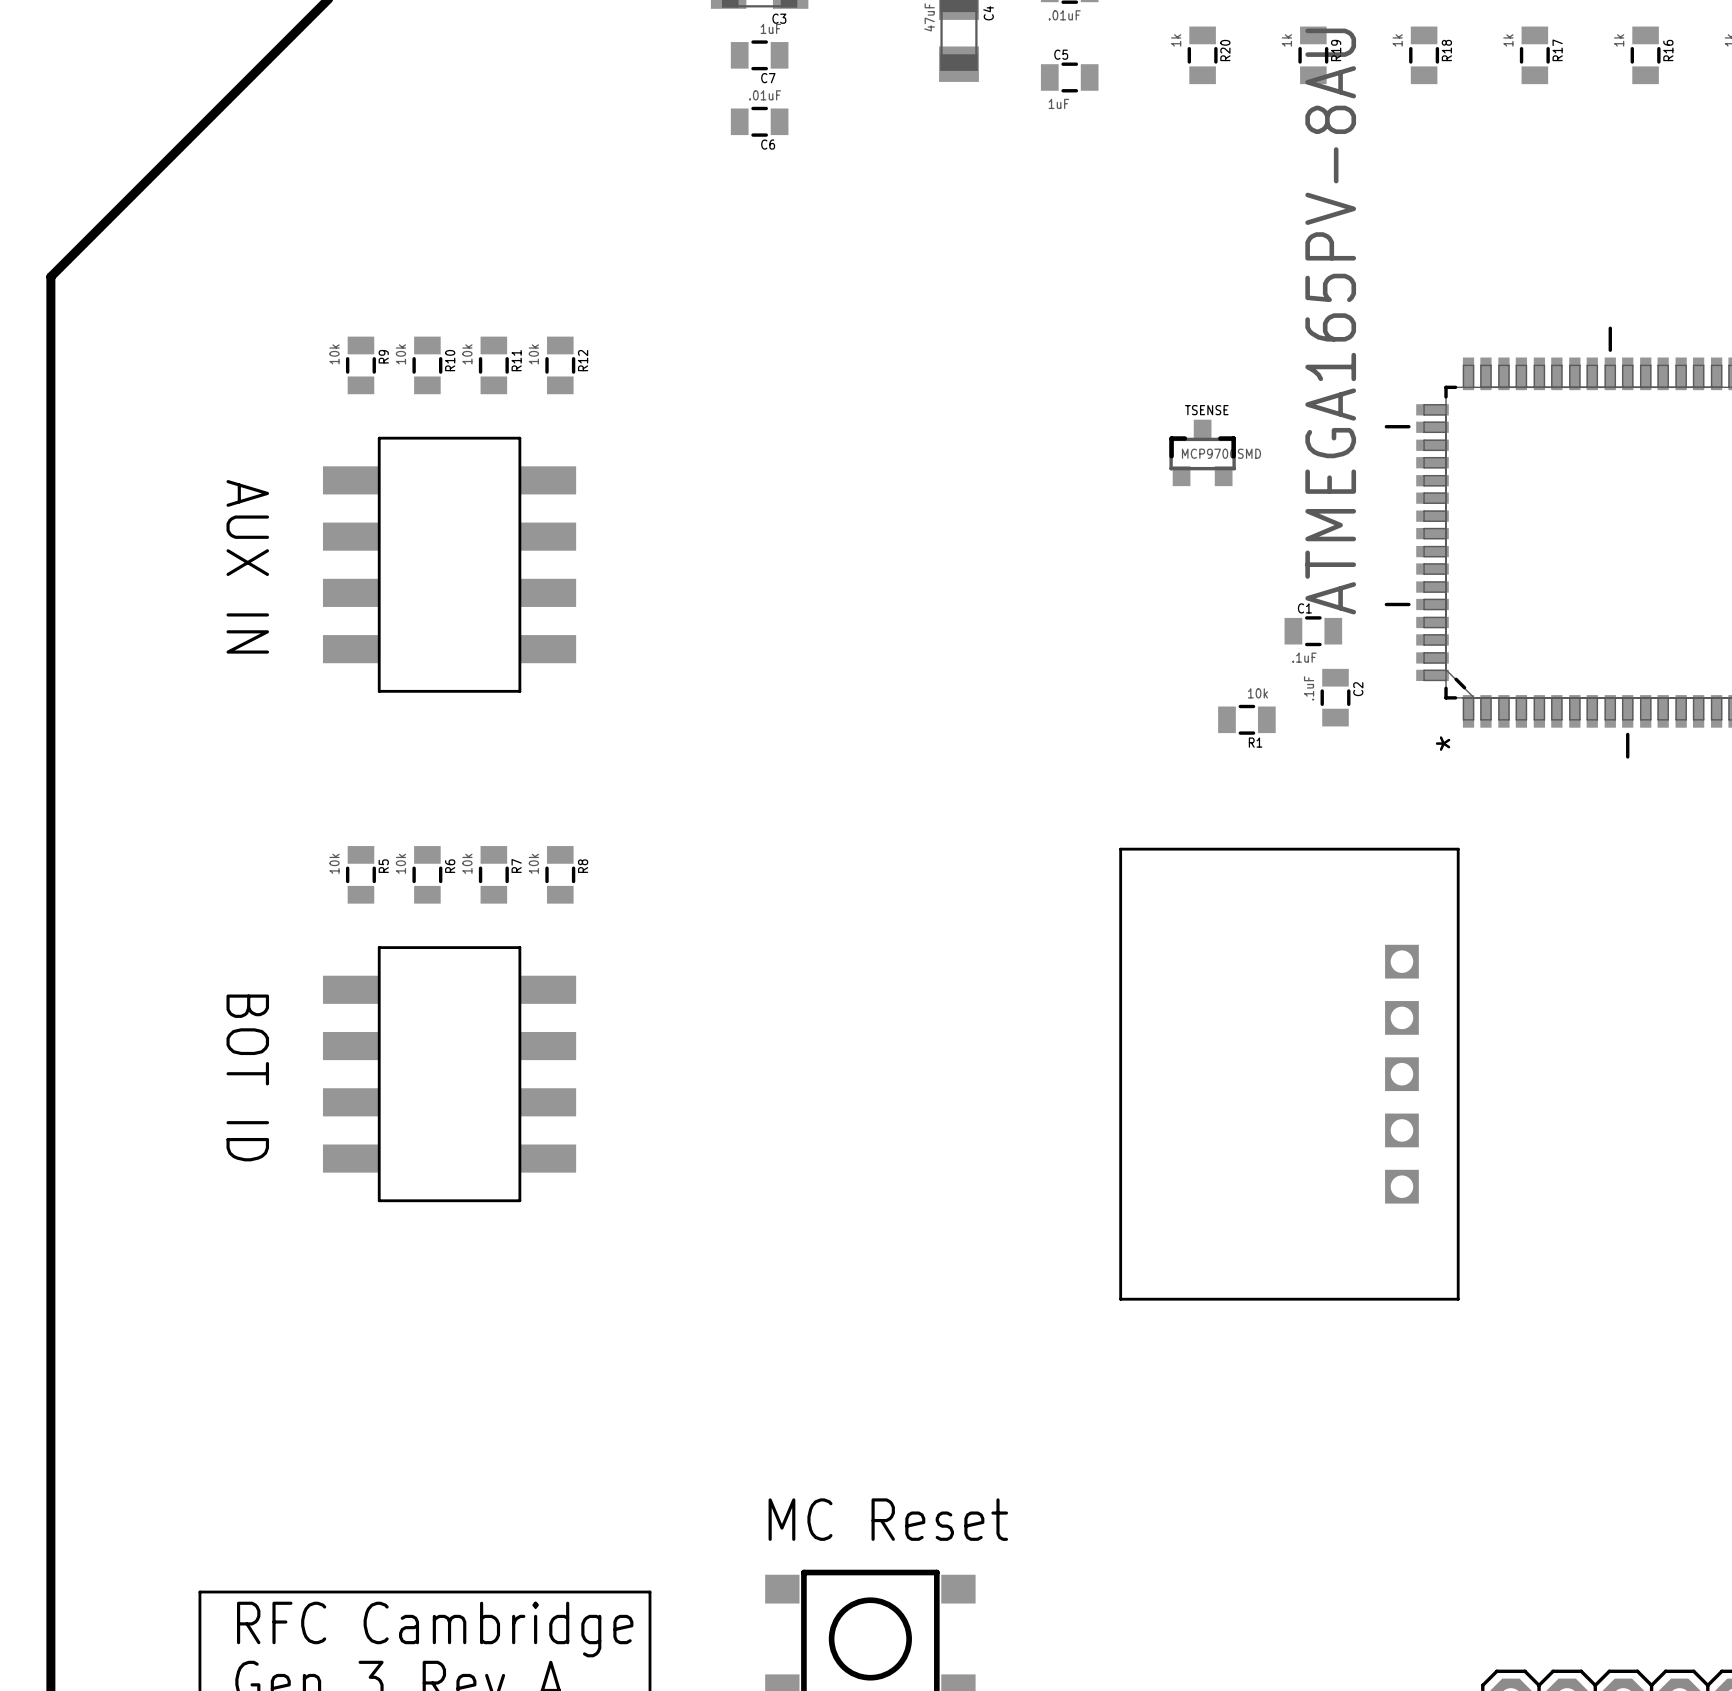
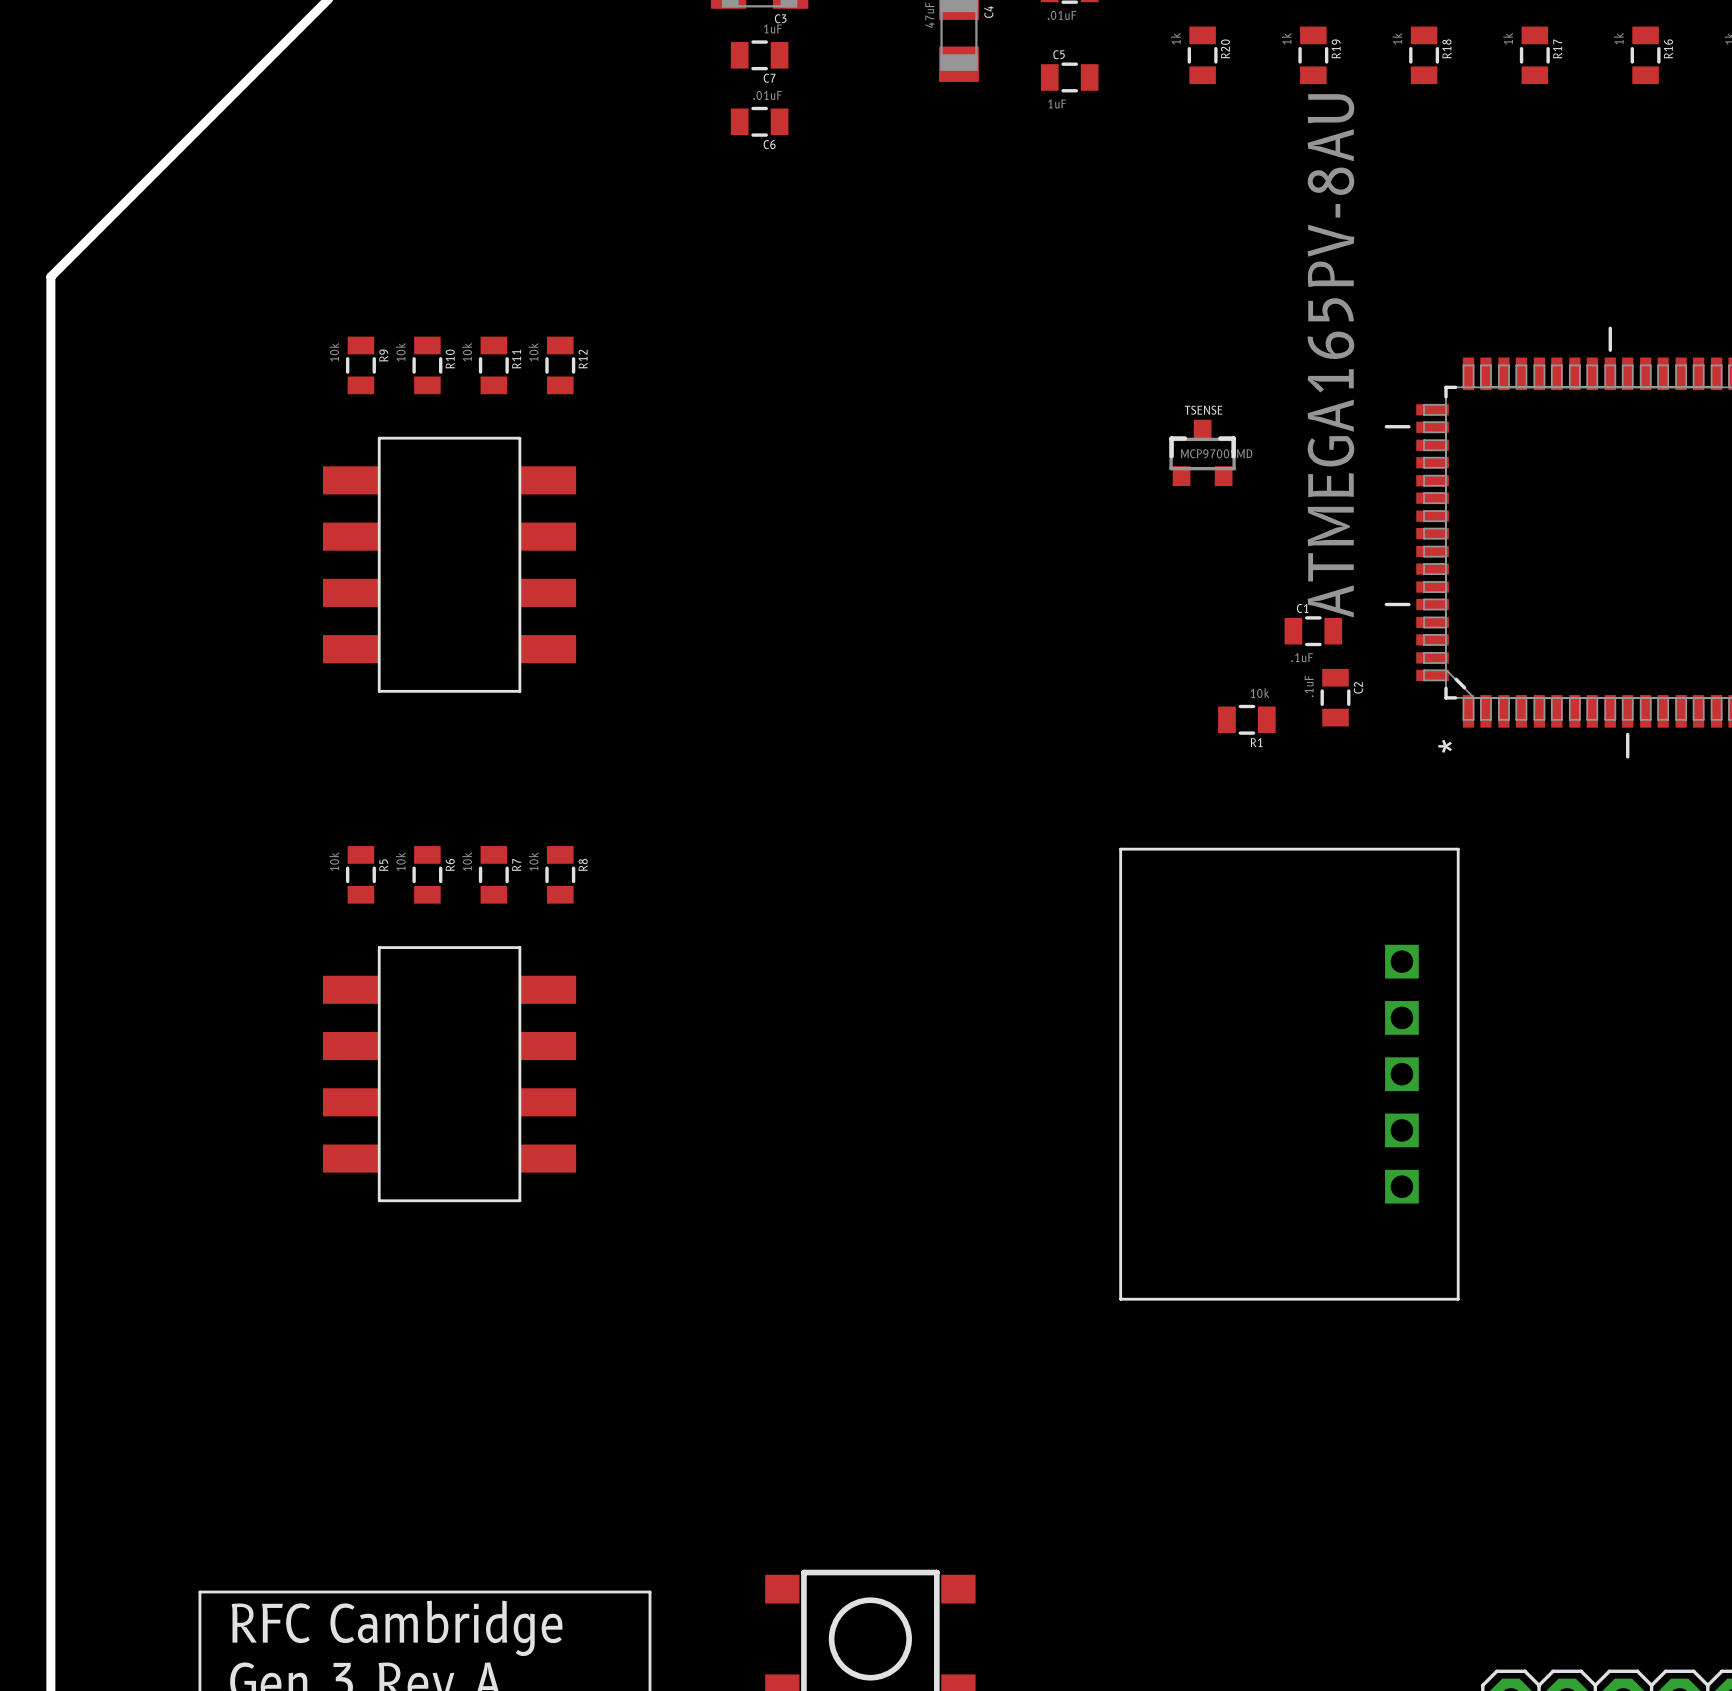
text: AUX IN (247, 566) -> none
text: BOT ID (247, 1077) -> none
text: MC Reset (888, 1519) -> none

